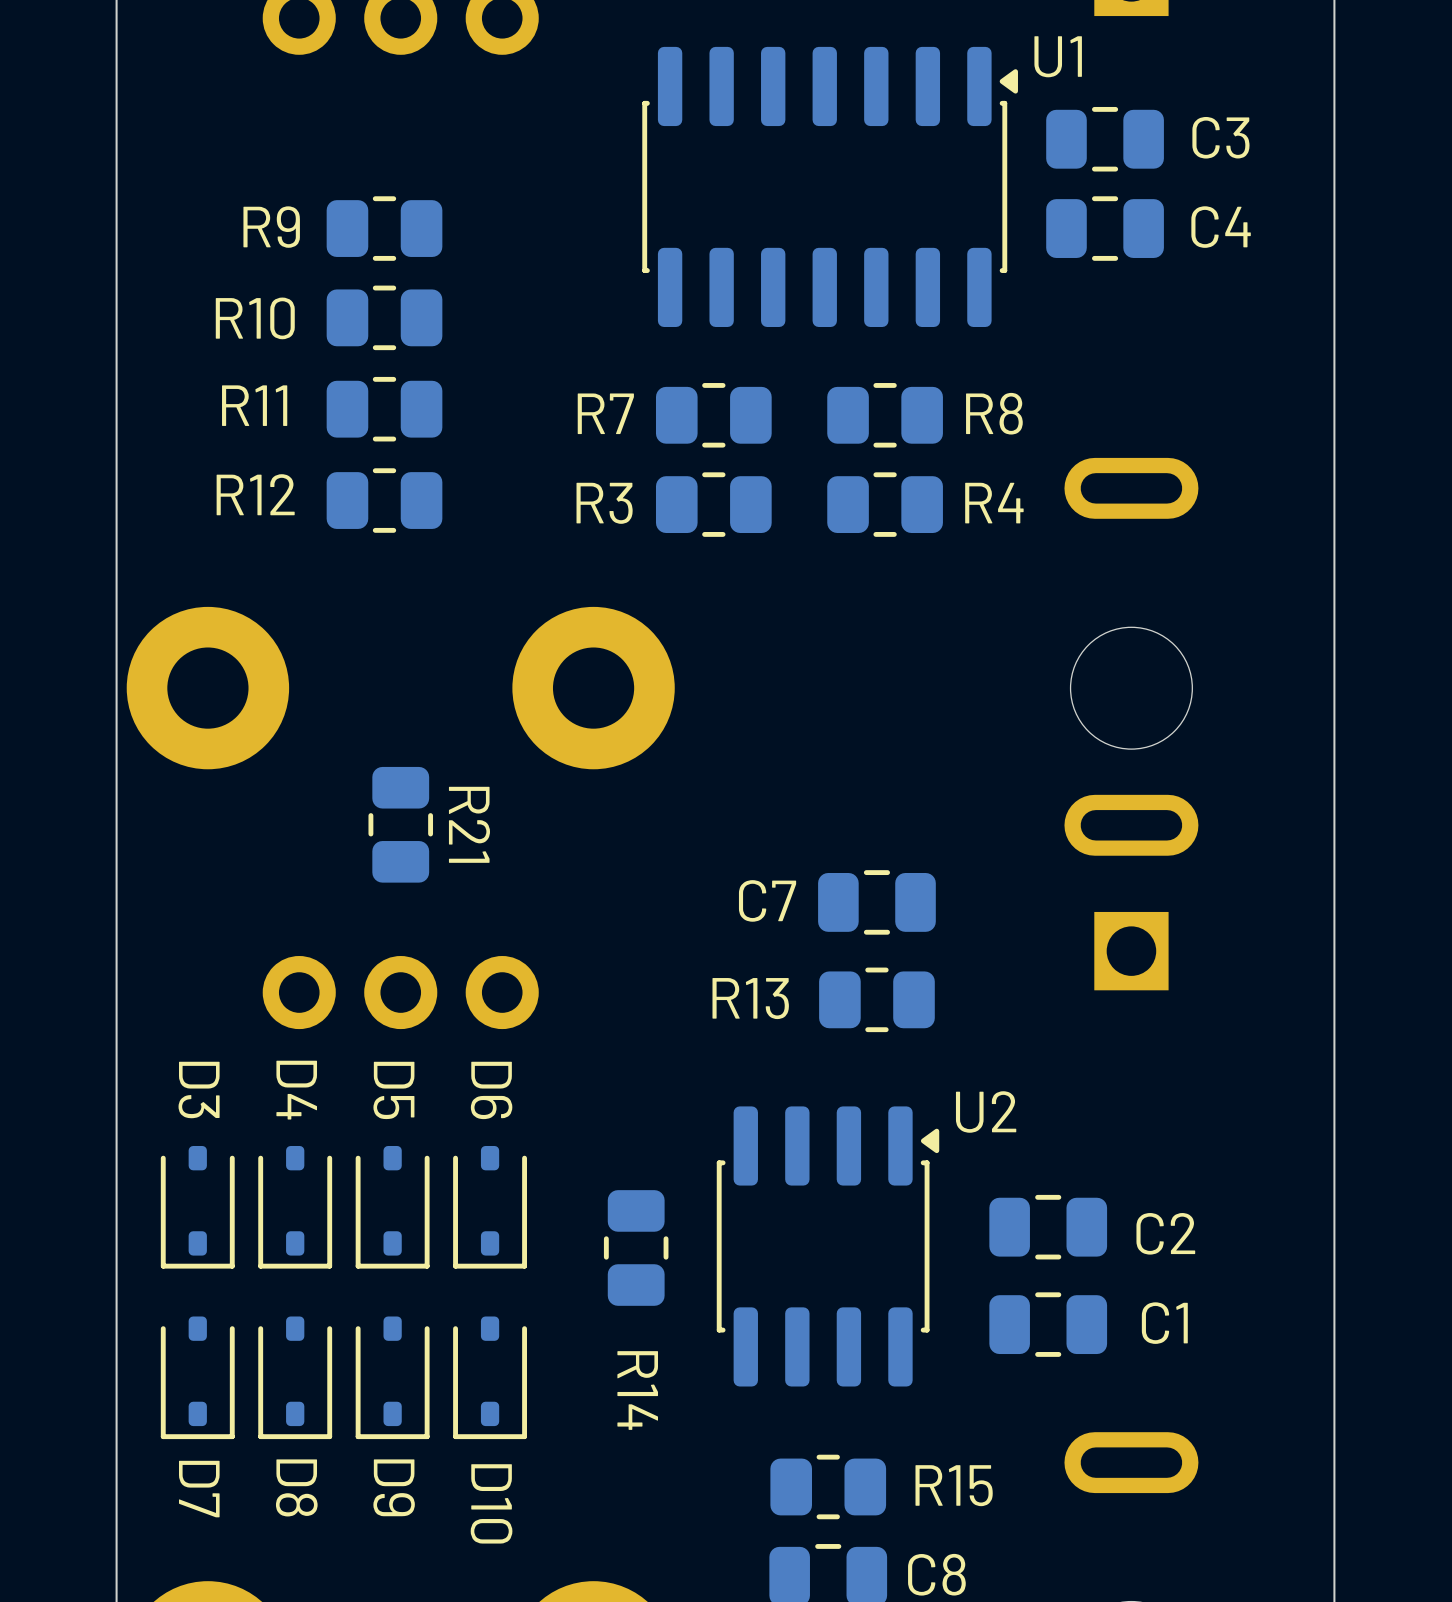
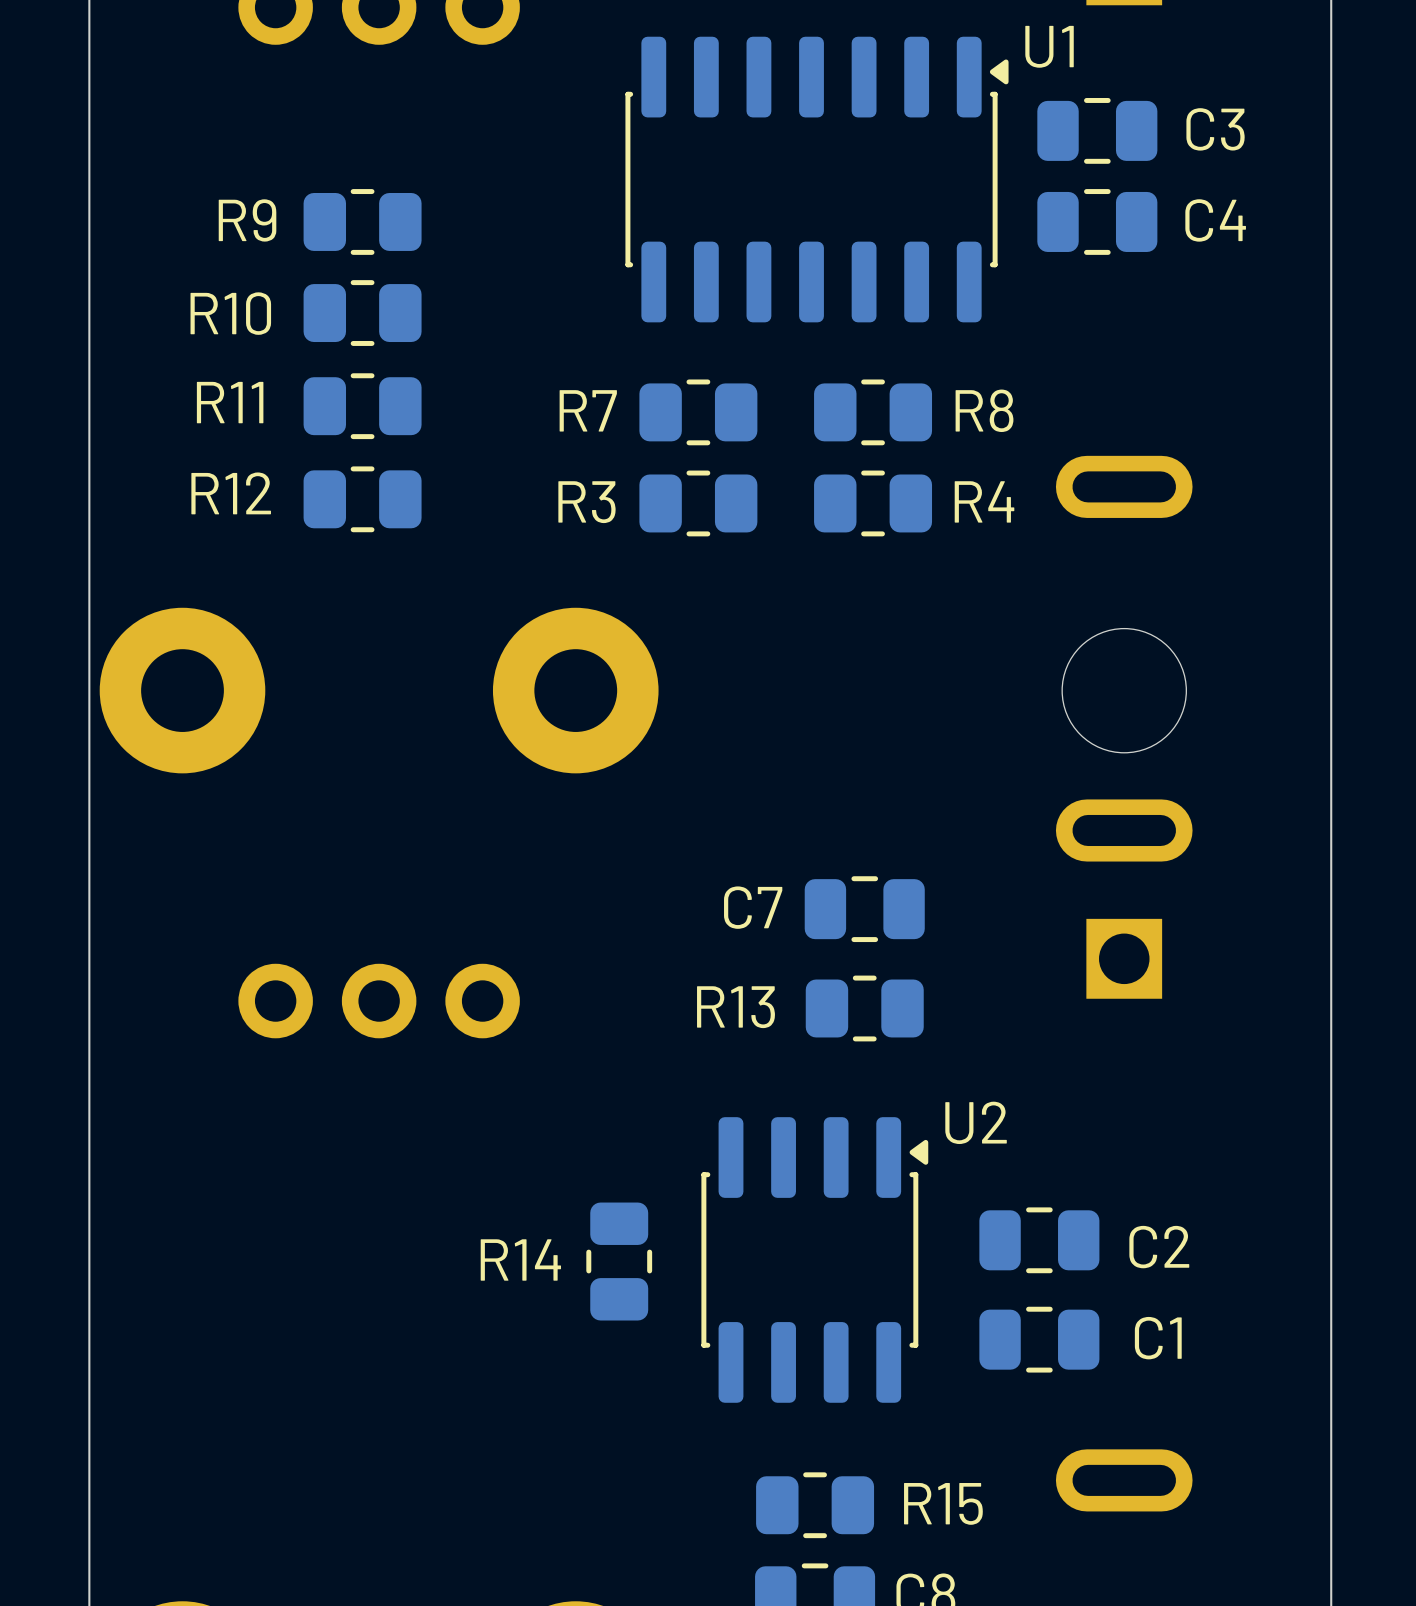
R21: (400, 824) -> none
D3: (197, 1207) -> none
D4: (295, 1207) -> none
D5: (392, 1207) -> none
D6: (490, 1207) -> none
D7: (197, 1377) -> none
D8: (295, 1377) -> none
D9: (392, 1377) -> none
D10: (490, 1377) -> none
R14 name rotation: 0° (637, 1390) -> 90° counterclockwise (520, 1259)
R14 name position: R14 (637, 1390) -> R14 (520, 1259)

